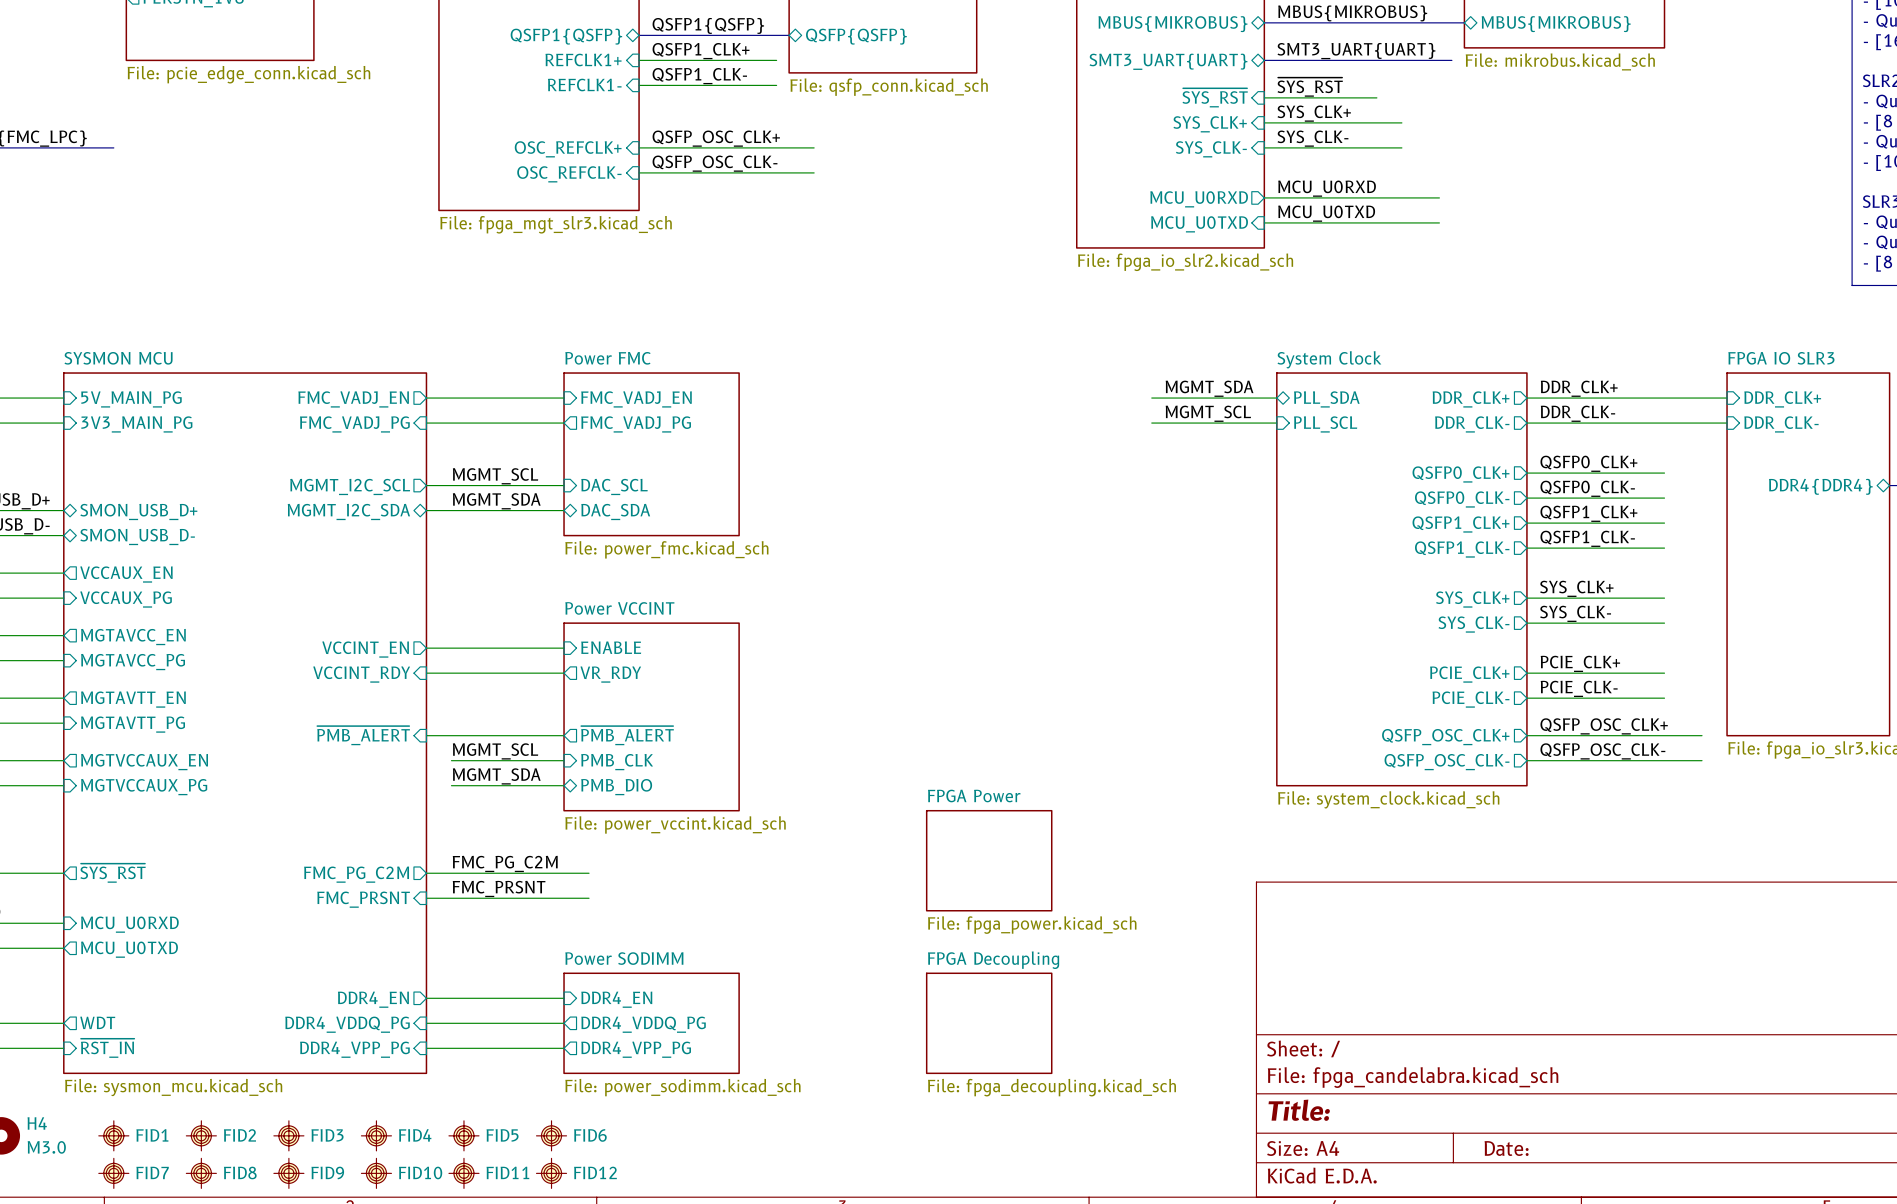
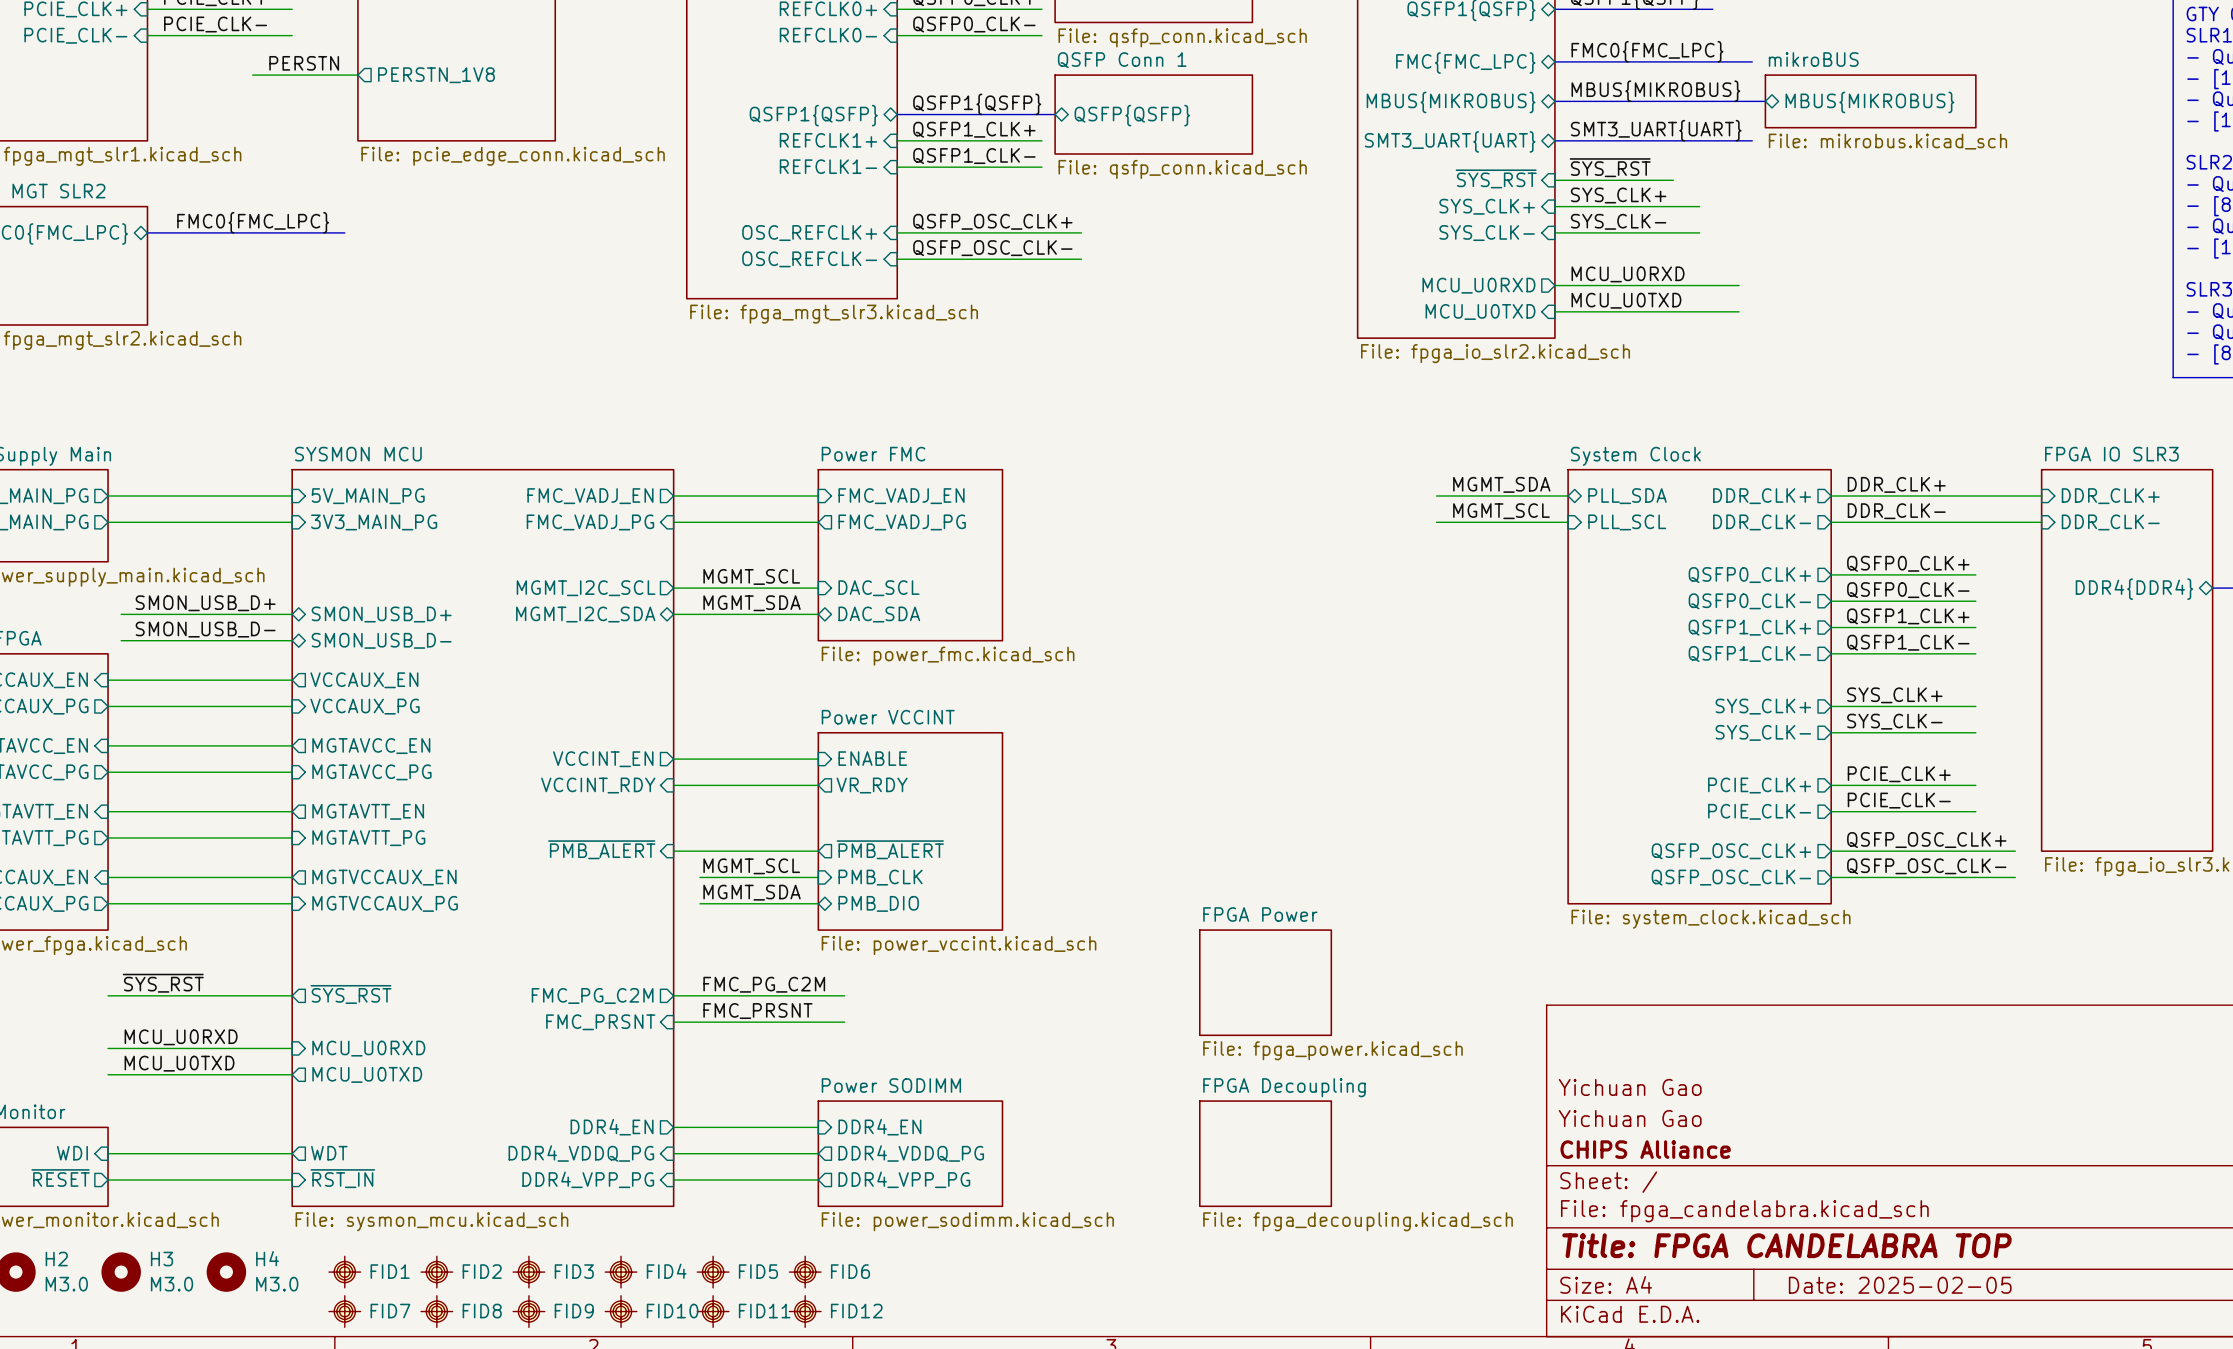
title block: none -> Yichuan Gao (1630, 1087)
title block: none -> Yichuan Gao (1630, 1118)
title block: none -> CHIPS Alliance (1645, 1149)
title block: Title: (1299, 1110) -> Title: FPGA CANDELABRA TOP (1786, 1245)
title block: Date: (1506, 1148) -> Date: 2025-02-05 (1900, 1285)

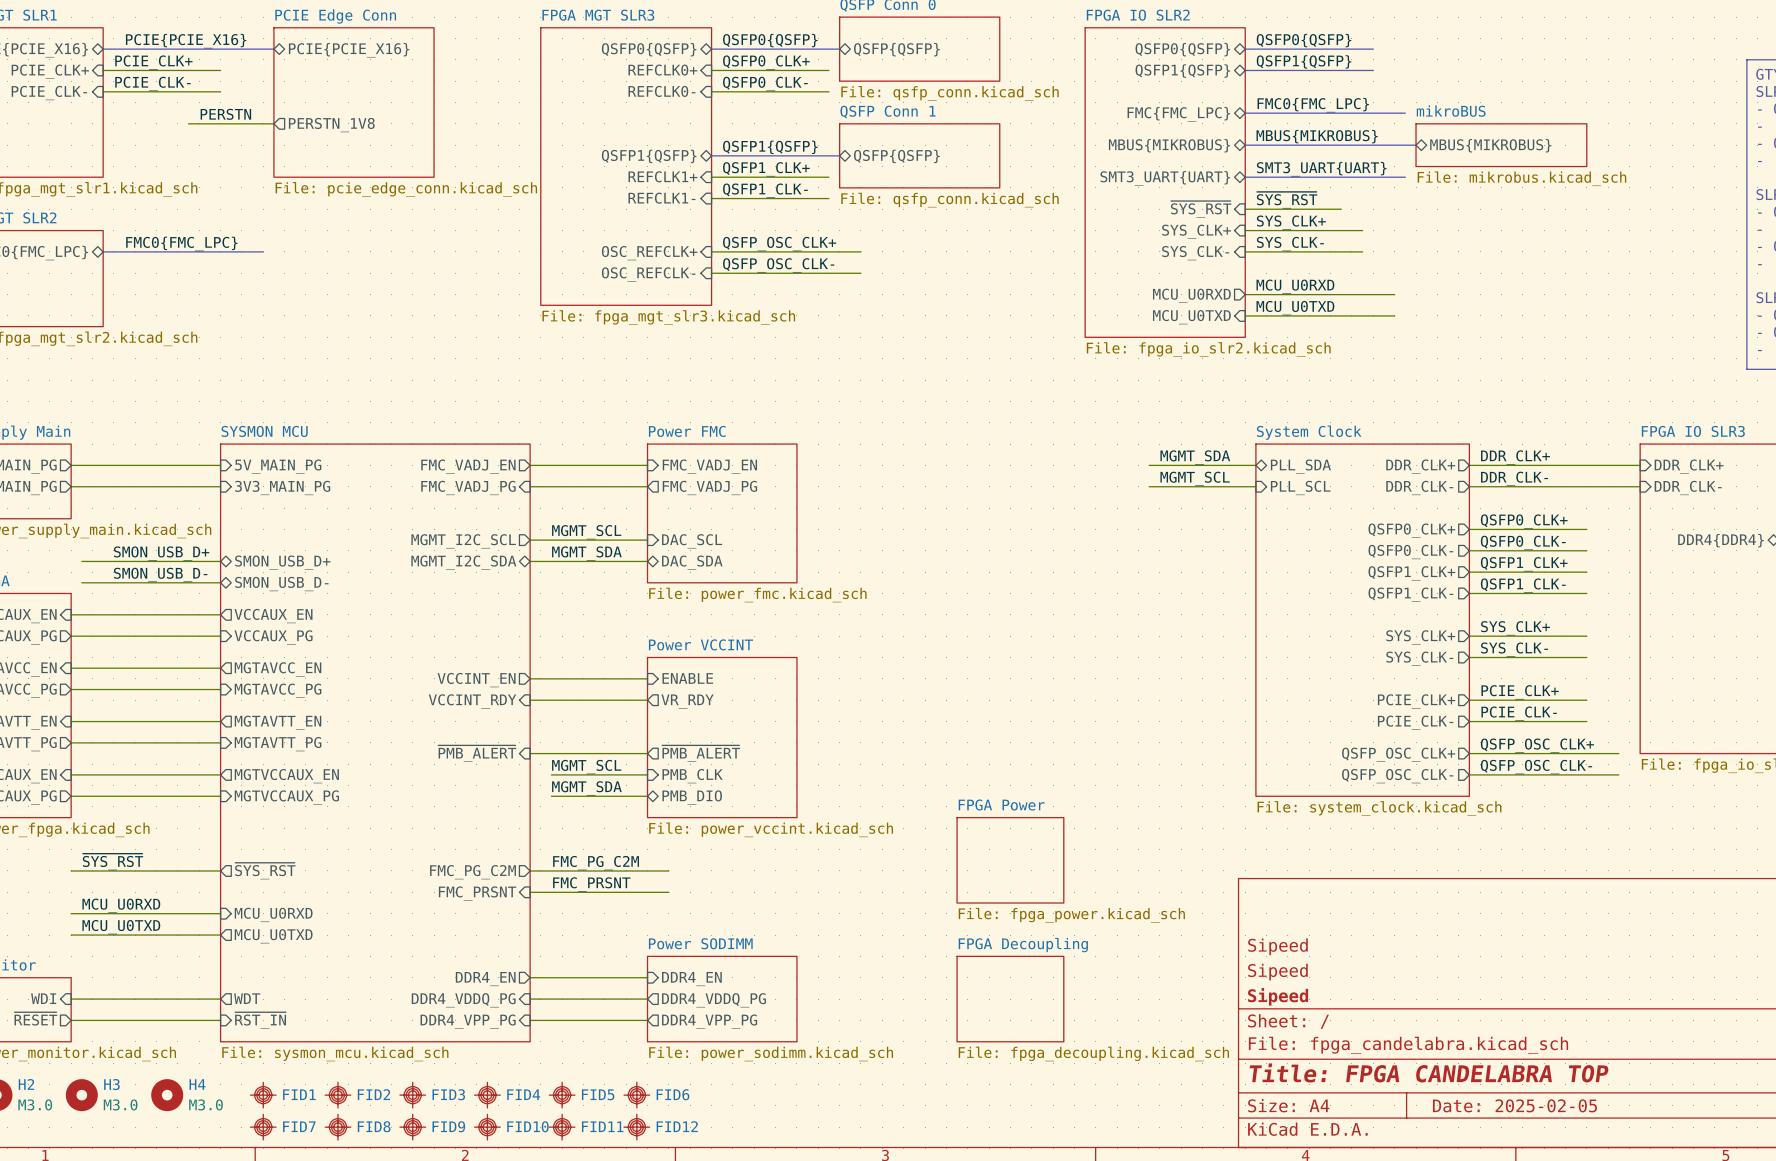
title block: Yichuan Gao (1630, 1087) -> Sipeed (1277, 946)
title block: Yichuan Gao (1630, 1118) -> Sipeed (1277, 972)
title block: CHIPS Alliance (1645, 1149) -> Sipeed (1278, 996)

